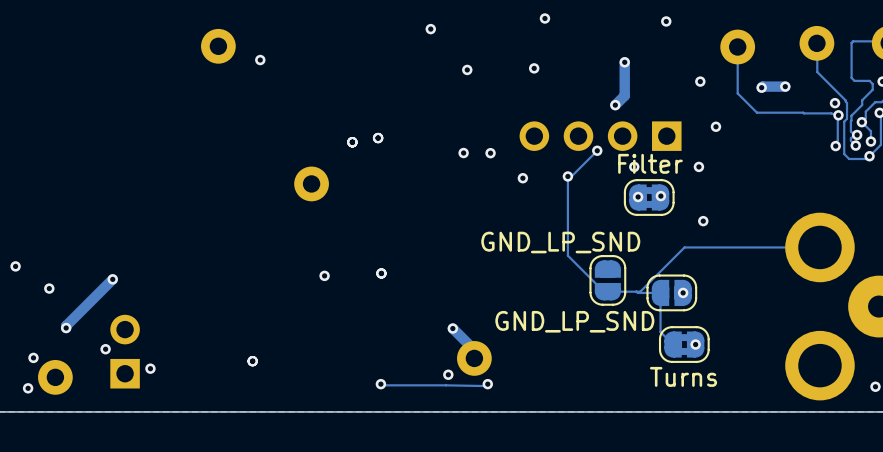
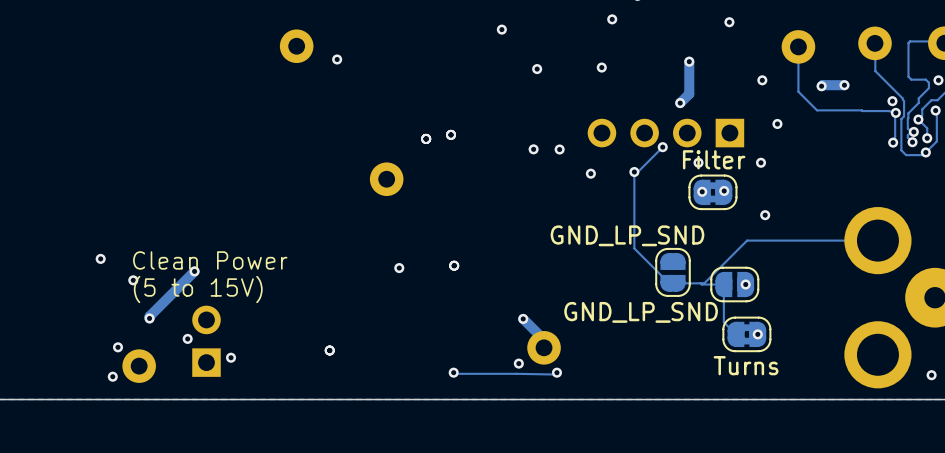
text: none -> Clean Power (210, 260)
text: none -> (5 to 15V) (198, 289)

